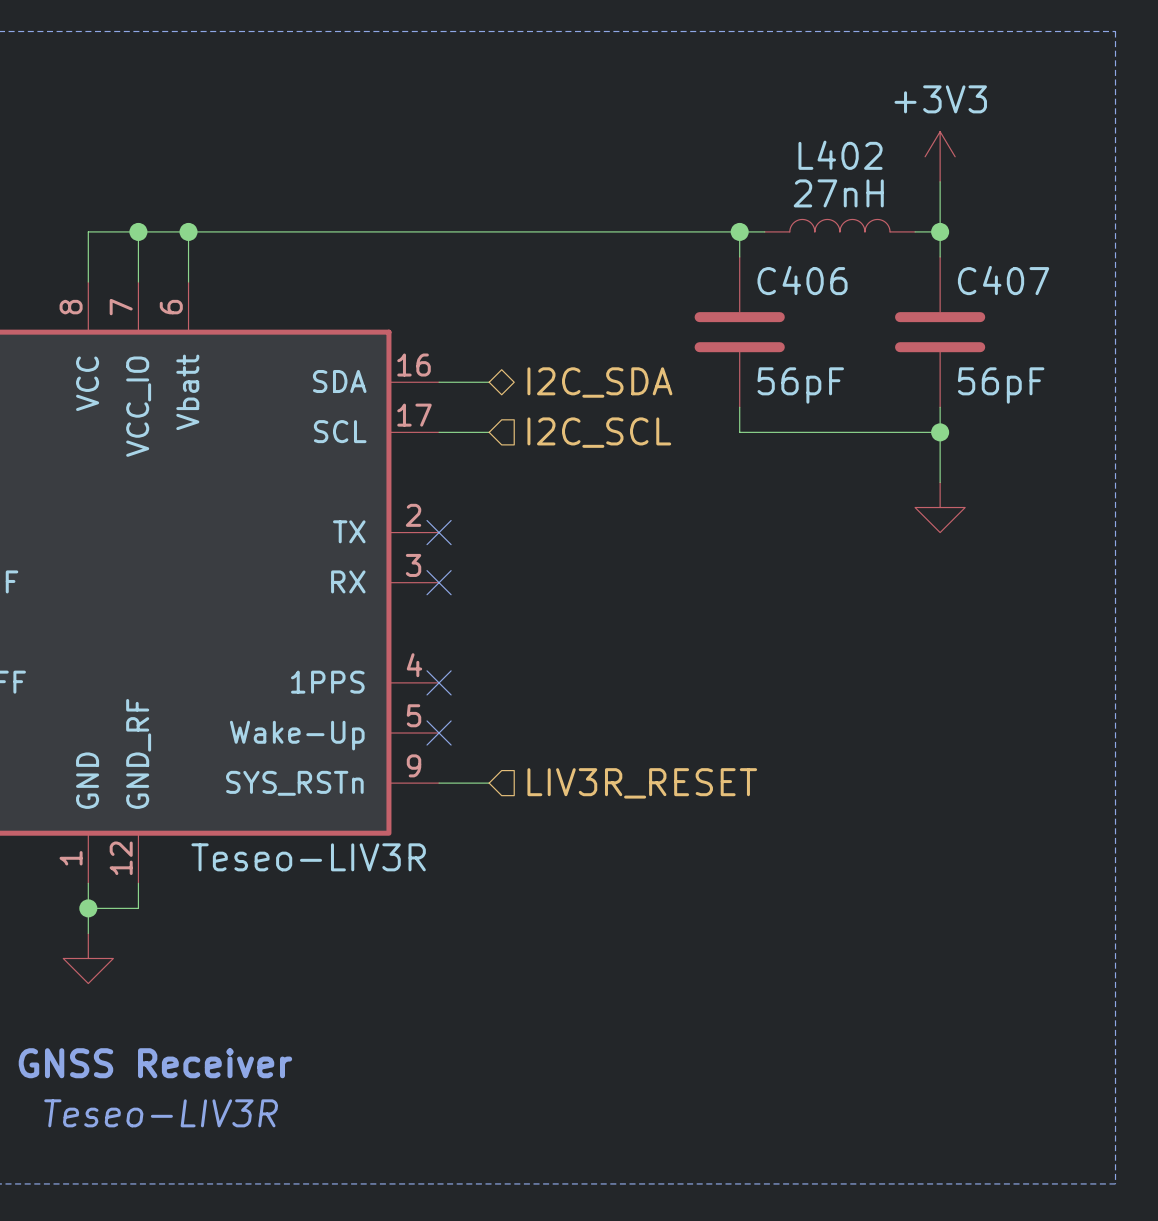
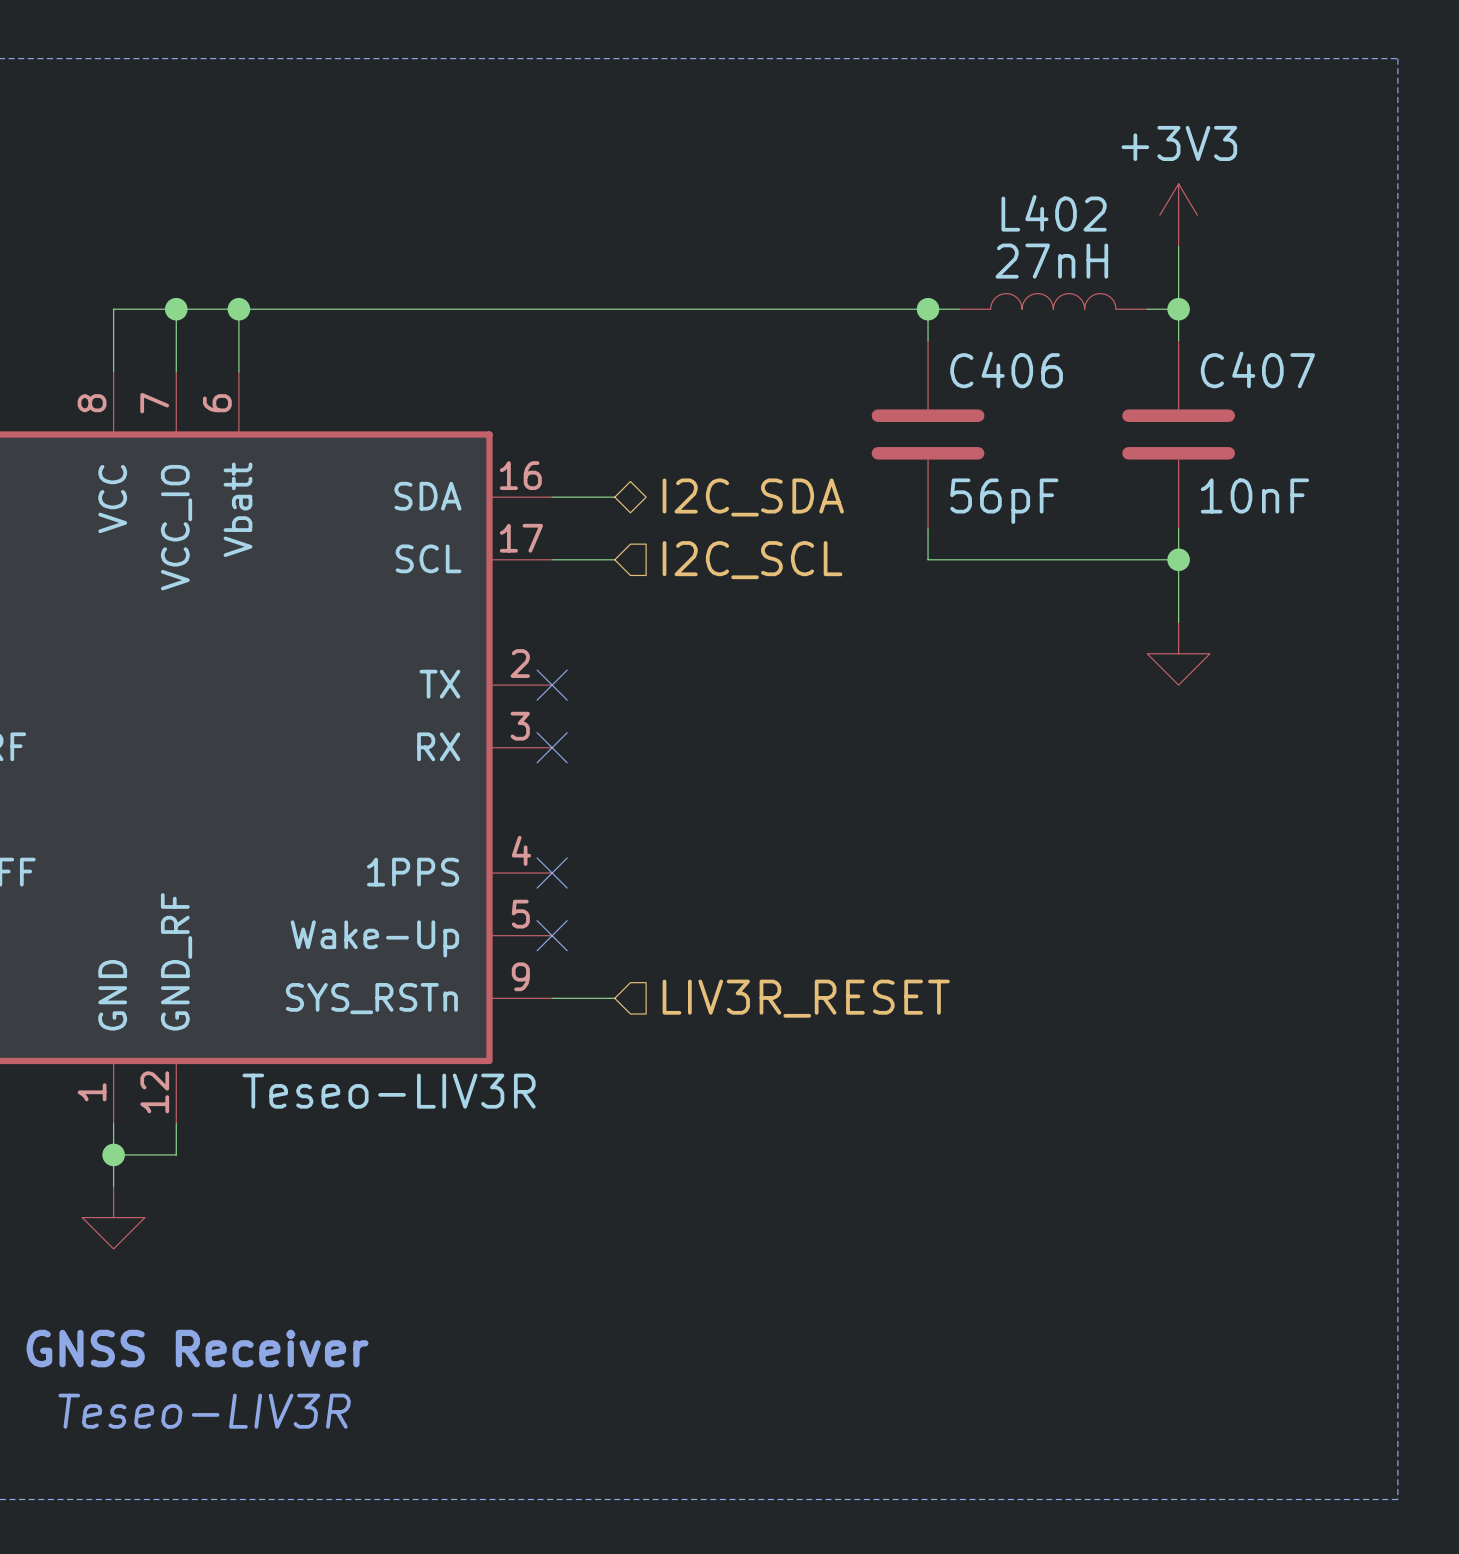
C407 value: 56pF (1001, 385) -> 10nF (1254, 495)

